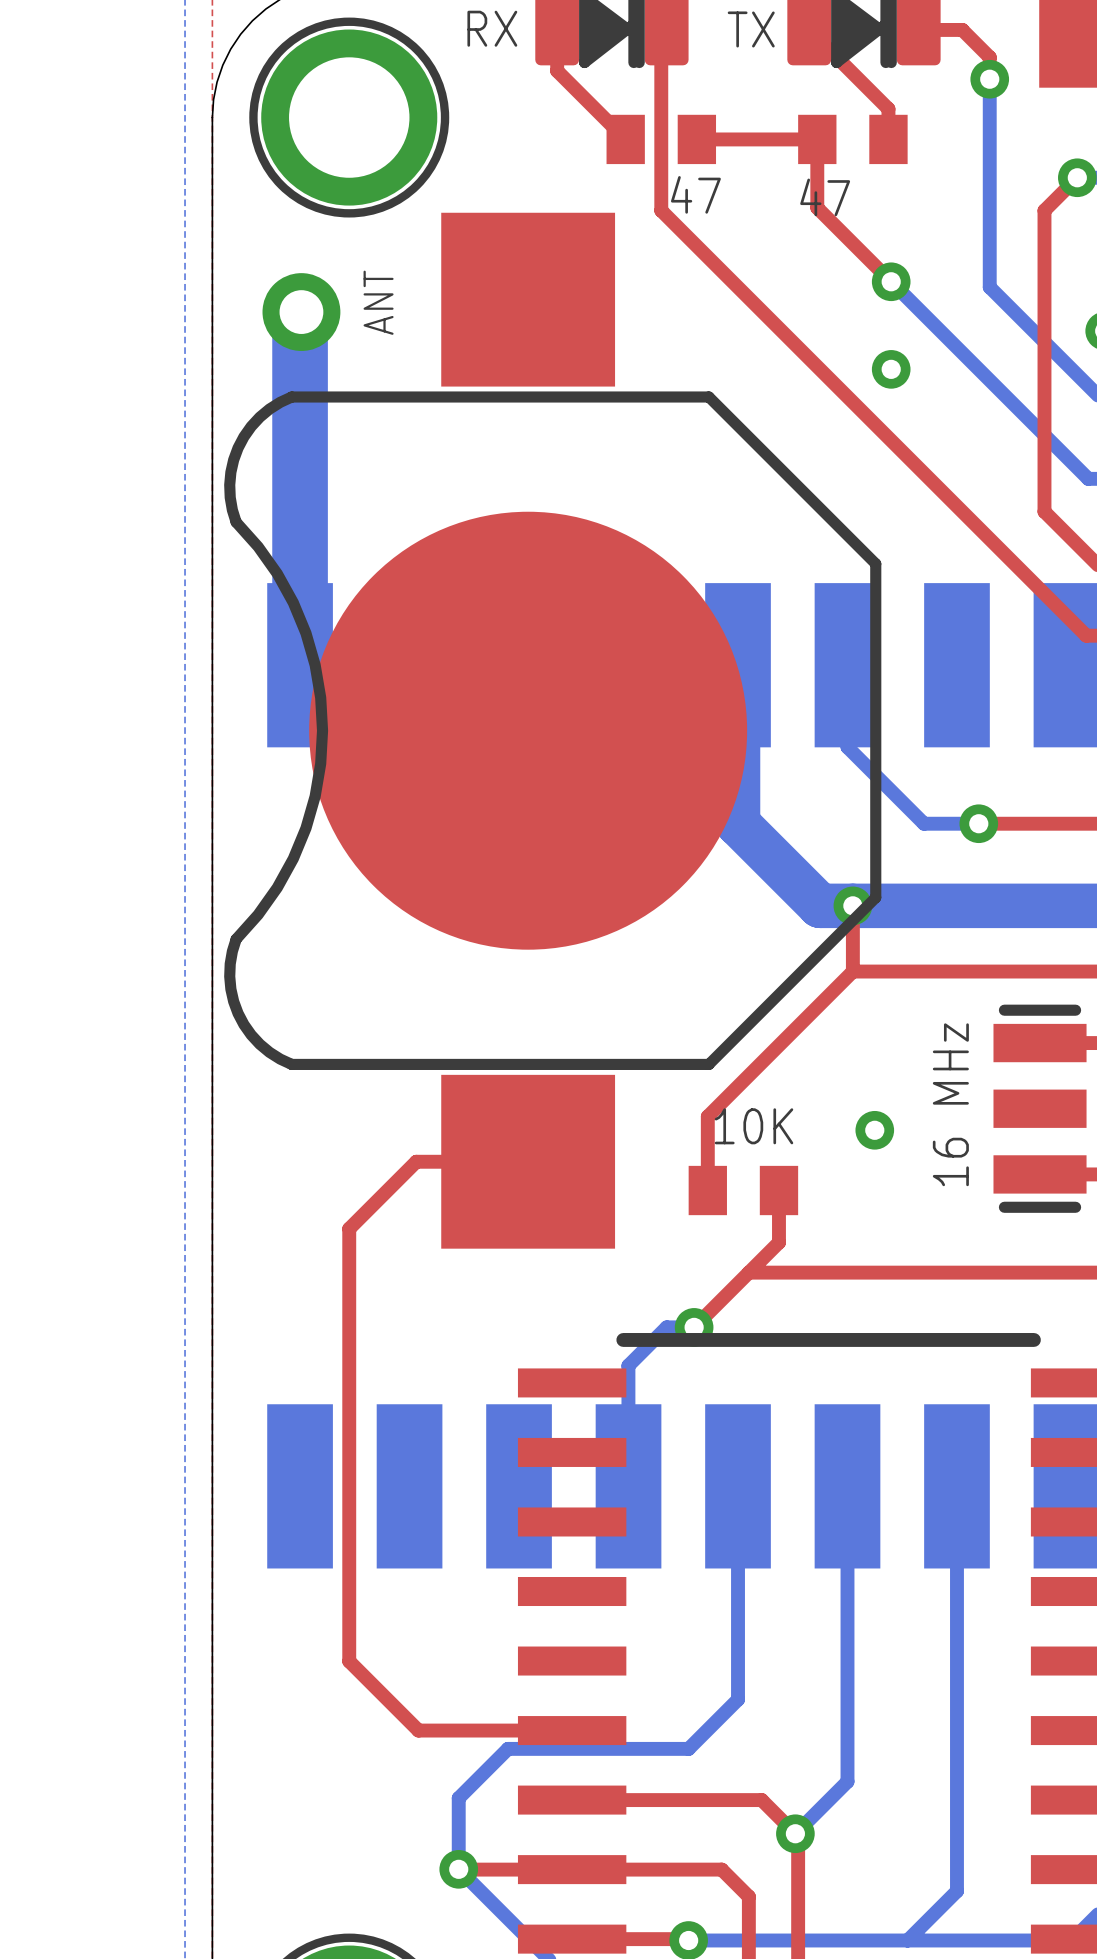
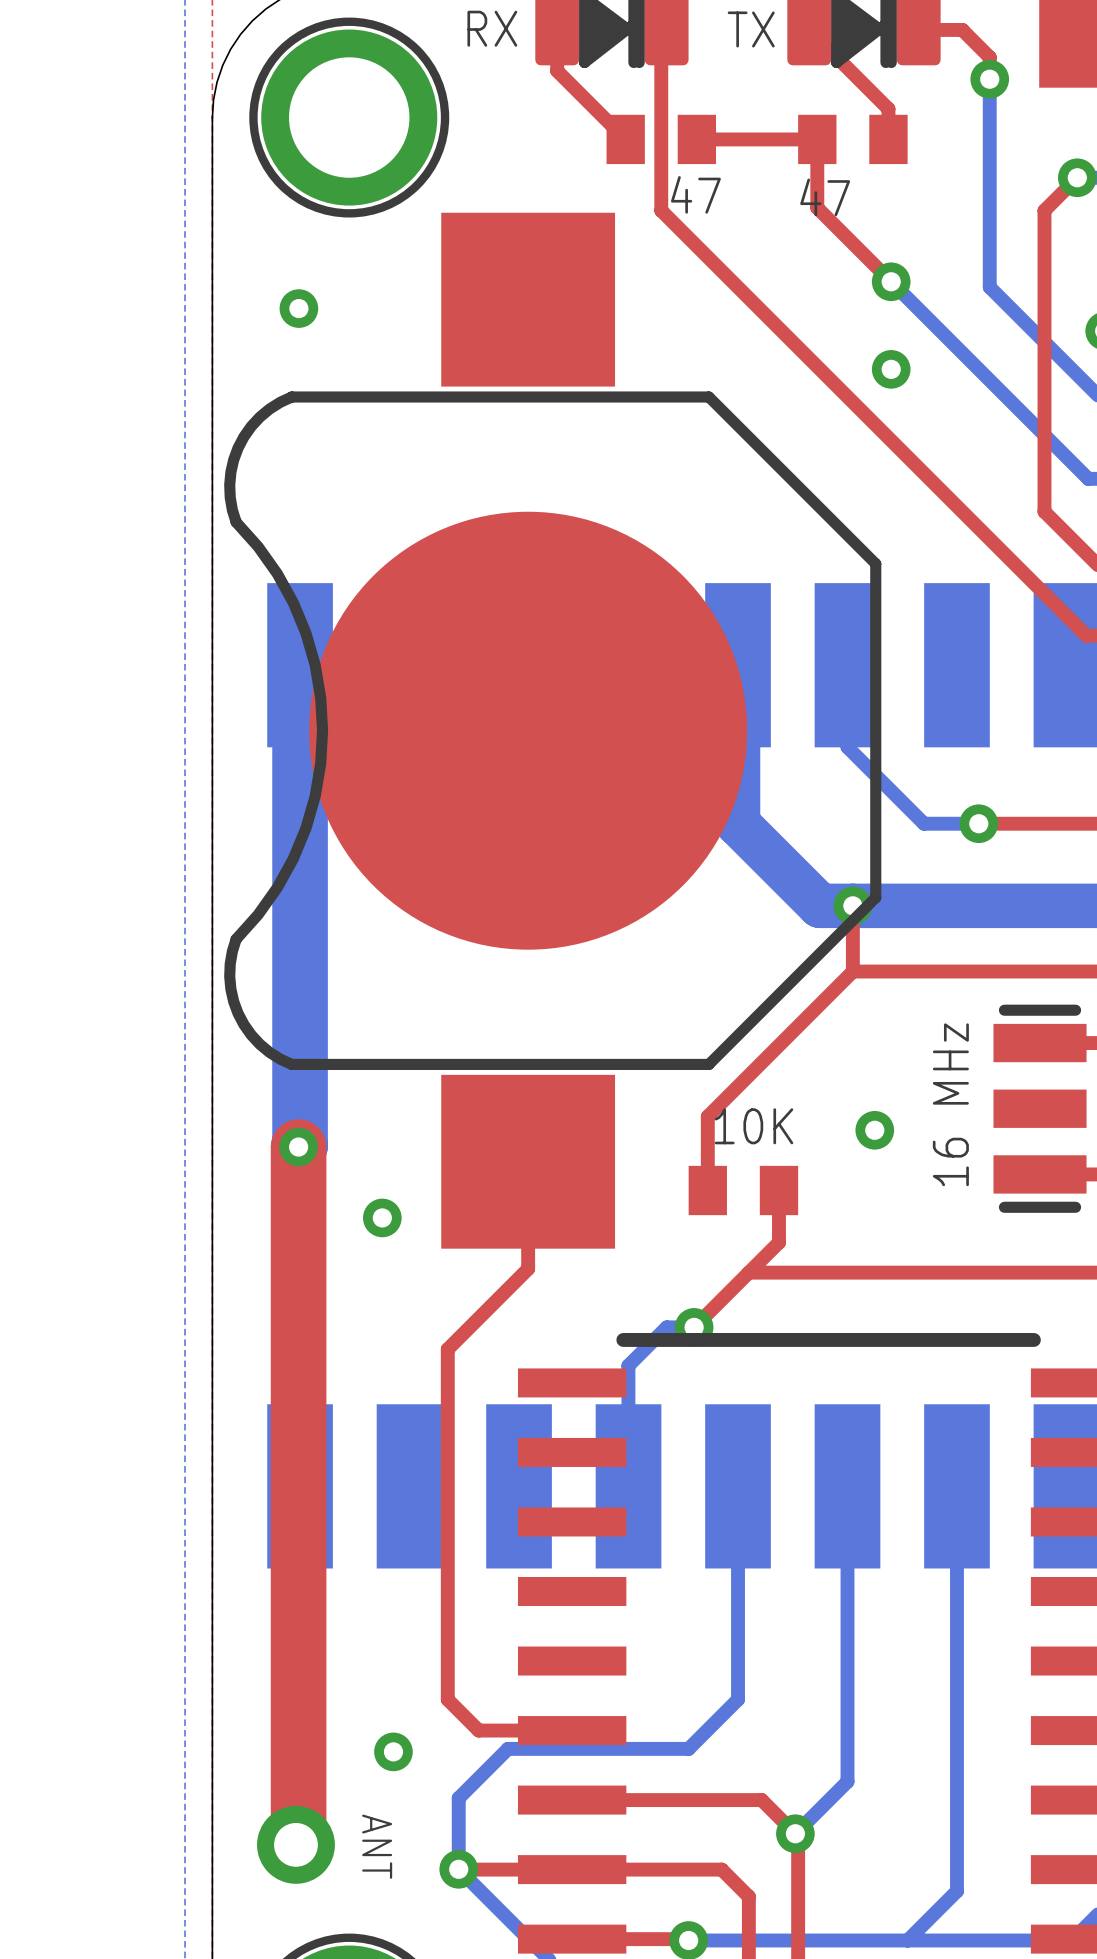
text: ANT (378, 302) -> none
via: none -> (298, 308)
bottom track: (301, 312) (300, 665) -> (298, 1147) (300, 665)
part: (301, 312) -> none
top track: none -> (298, 1147) (298, 1842) (295, 1844)
via: none -> (298, 1147)
top track: (528, 1161) (416, 1161) (349, 1228) (349, 1661) (418, 1730) (478, 1730) -> (528, 1161) (528, 1268) (447, 1349) (447, 1699) (478, 1730)
via: none -> (382, 1217)
via: none -> (393, 1751)
part: none -> (295, 1844)
text: none -> ANT (377, 1846)

